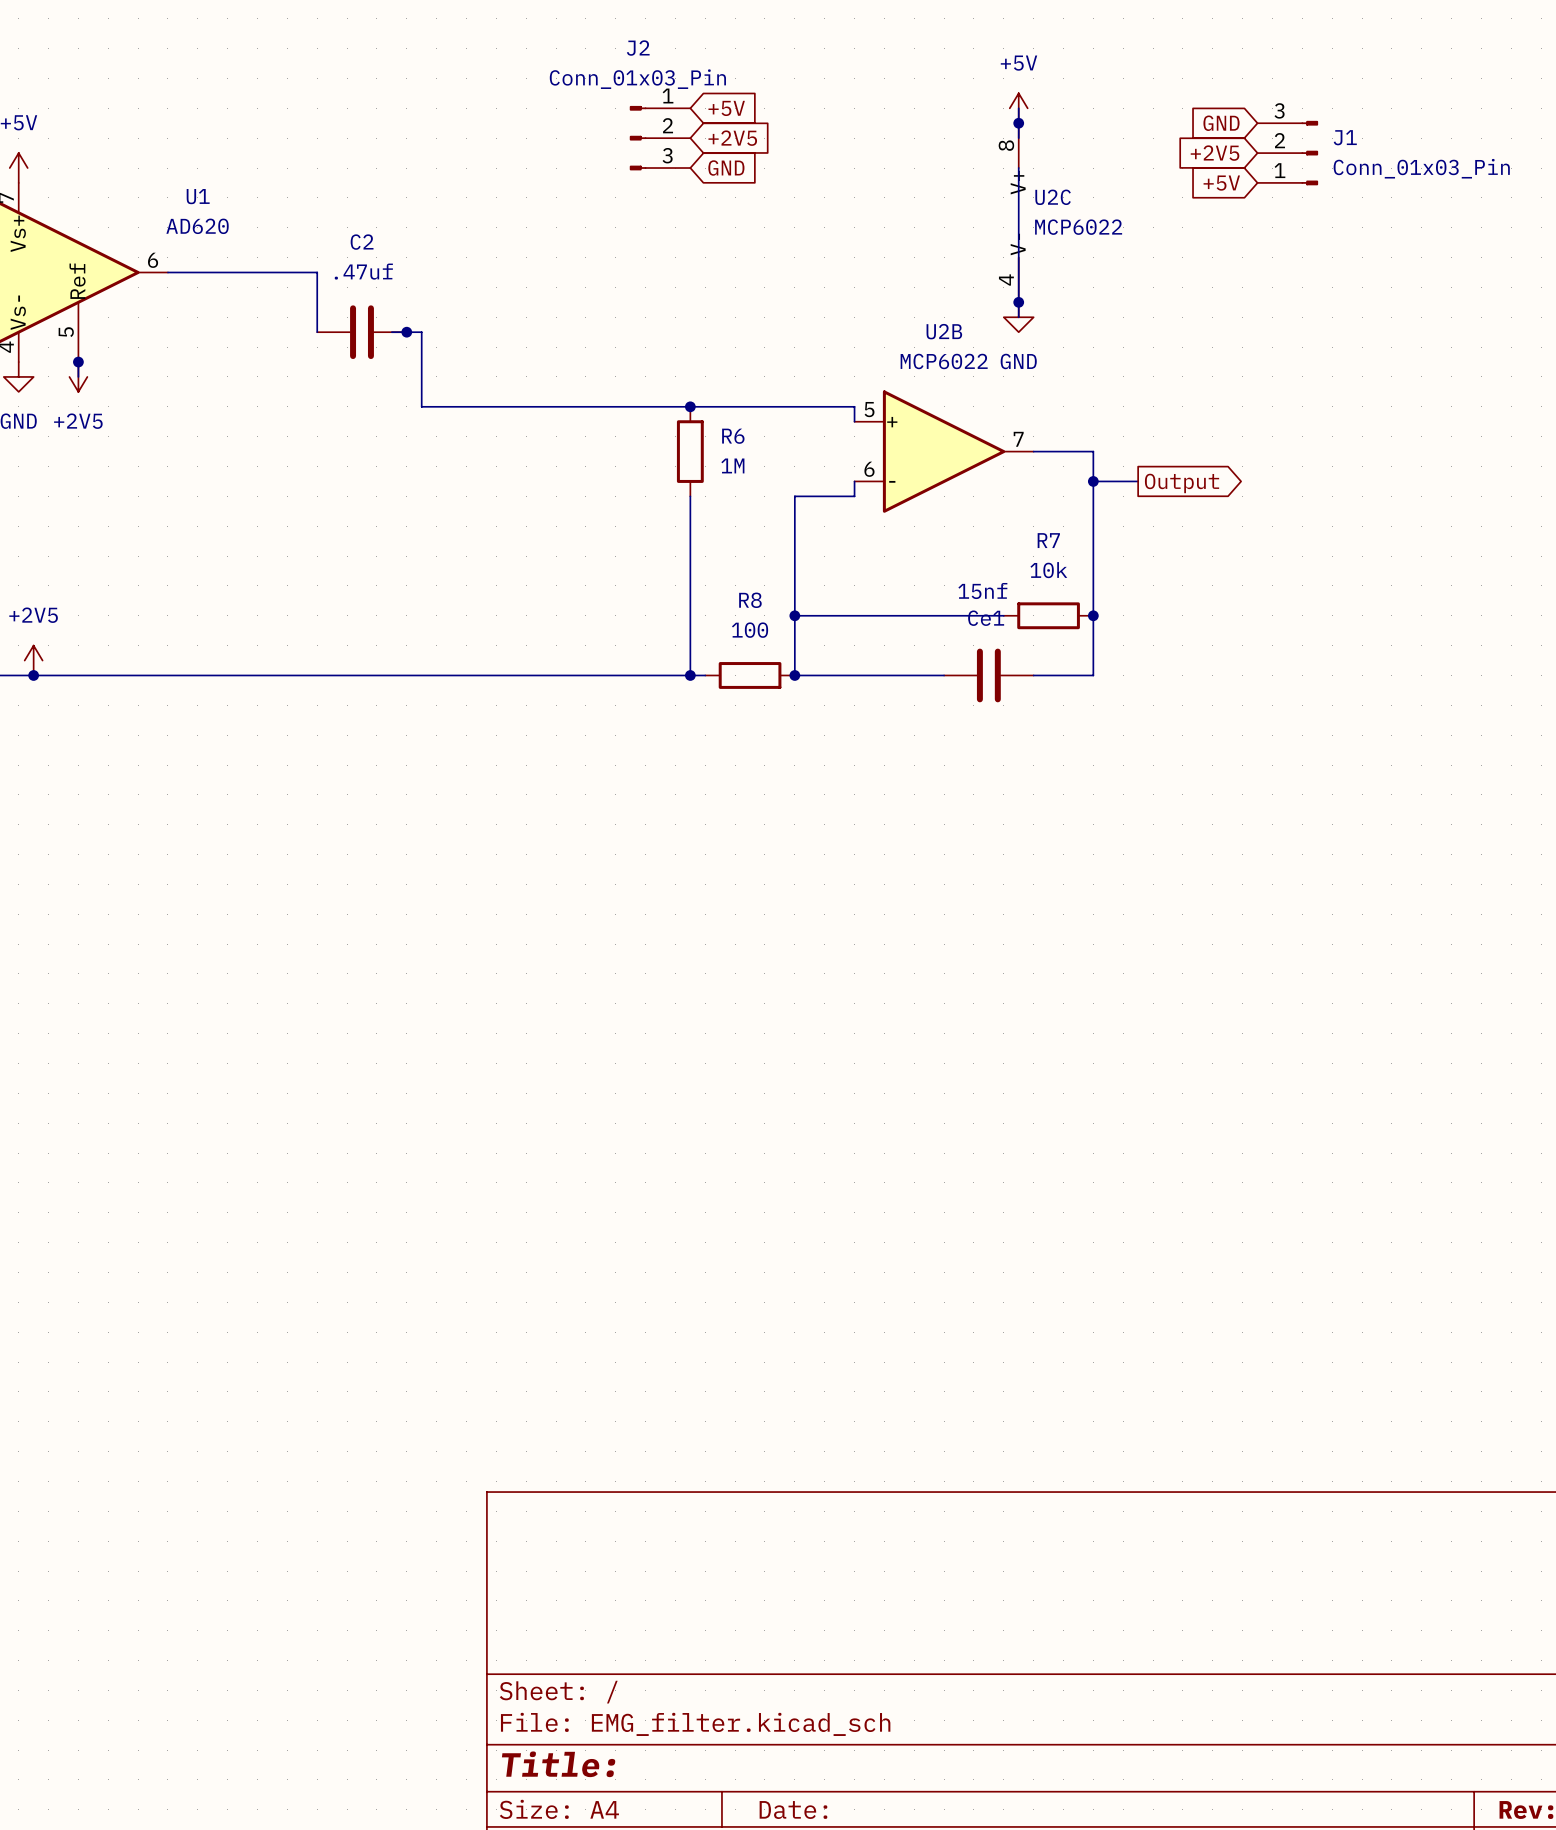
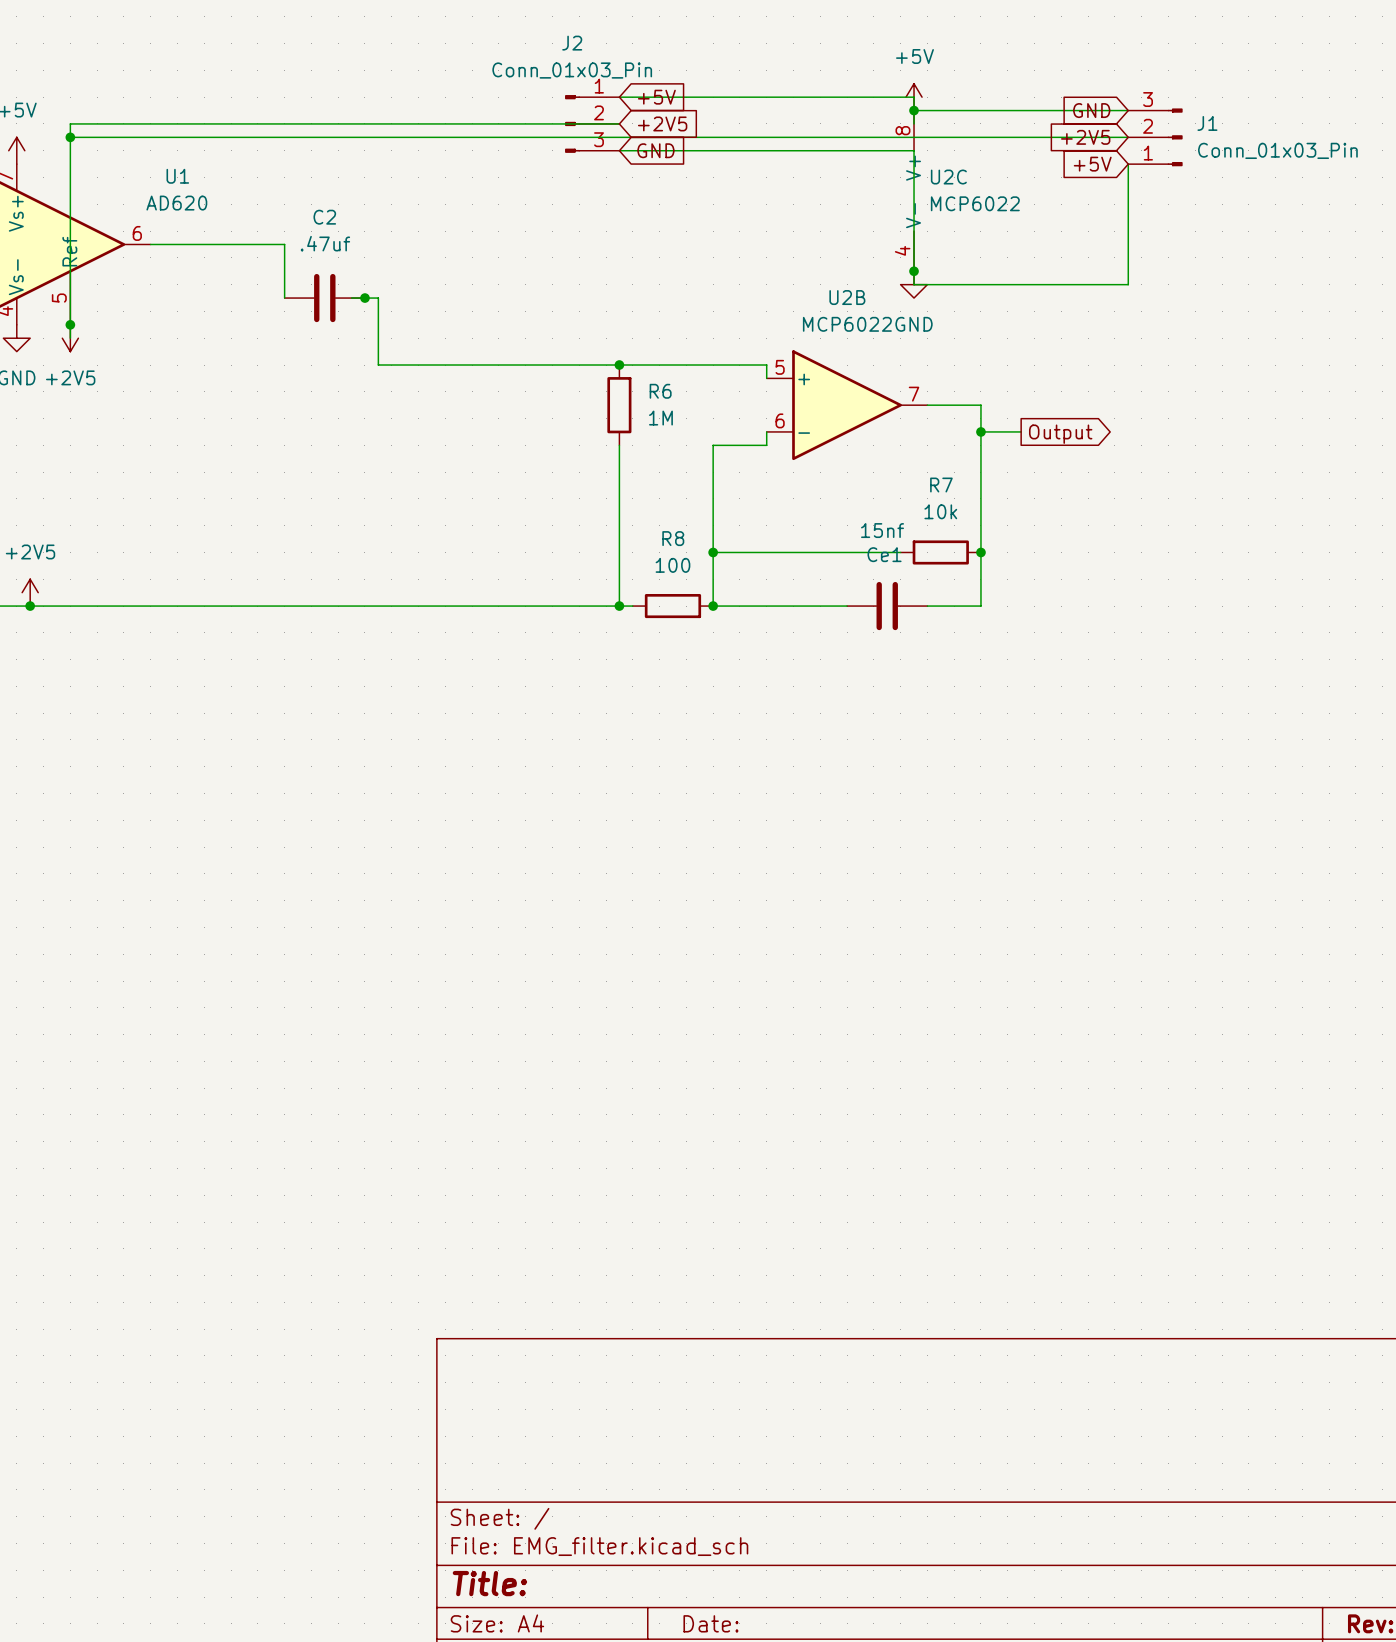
wire: none -> (619, 97) (914, 97)
wire: none -> (914, 110) (1128, 110)
wire: none -> (619, 123) (70, 123) (70, 324)
wire: none -> (70, 137) (1128, 137)
junction: none -> (70, 137)
wire: none -> (619, 150) (914, 150)
wire: none -> (1128, 164) (1128, 284) (914, 284)

